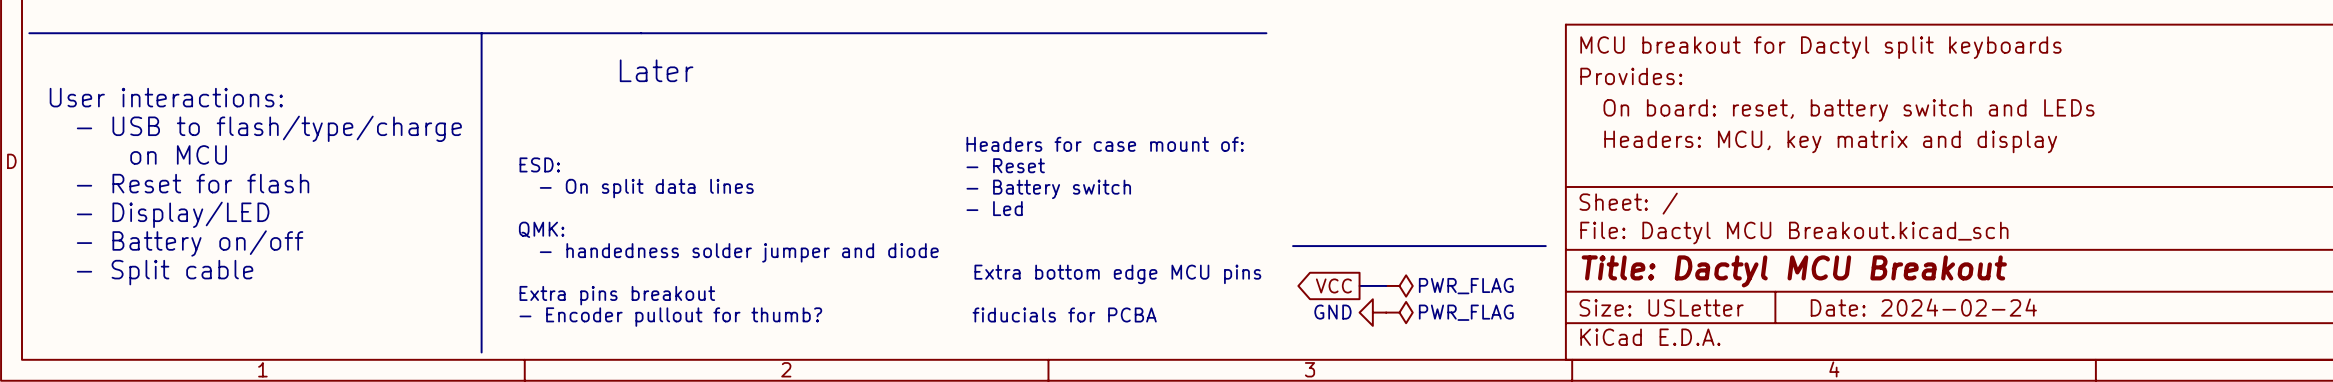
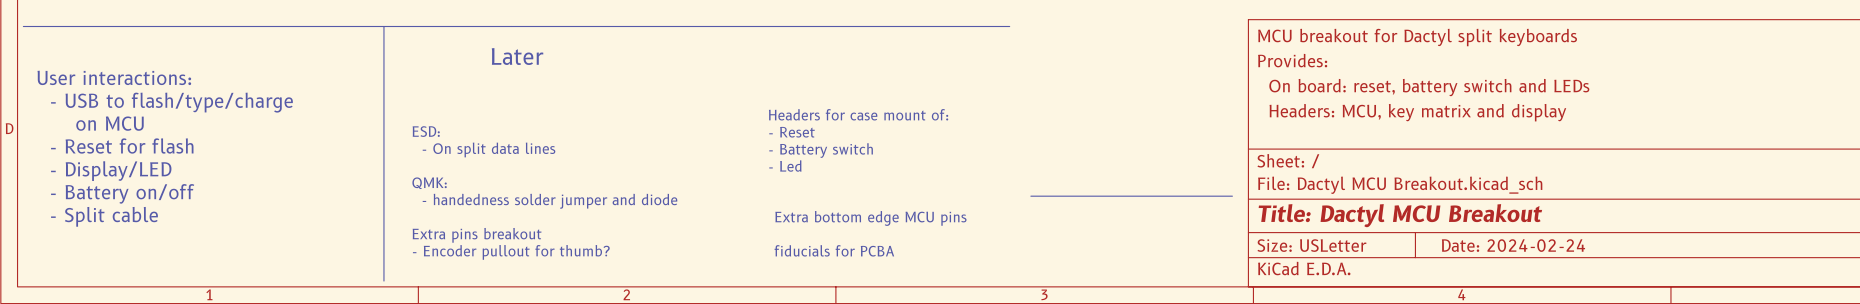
global label: VCC (1333, 285) -> none
wire: (1359, 285) (1386, 285) -> none
power symbol: PWR_FLAG (1399, 285) -> none
power symbol: GND (1372, 312) -> none
power symbol: PWR_FLAG (1399, 312) -> none

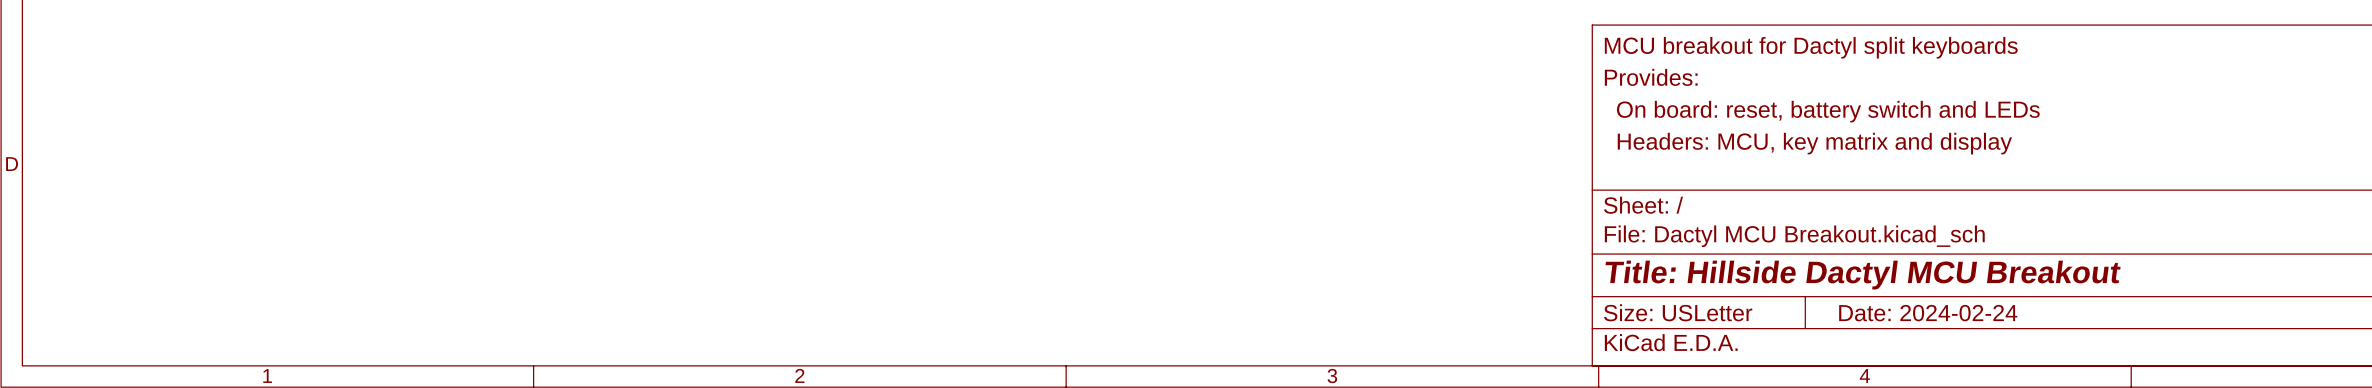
line: (23, 26) (1009, 26) -> none
line: (383, 26) (383, 281) -> none
text: Later (517, 56) -> none
text: User interactions: (114, 77) -> none
text: - USB to flash/type/charge (171, 102) -> none
text: Headers for case mount of: (858, 114) -> none
text: on MCU (109, 123) -> none
text: ESD: (426, 131) -> none
text: - Reset (792, 132) -> none
text: - Reset for flash (122, 146) -> none
text: - On split data lines (489, 149) -> none
text: - Battery switch (821, 150) -> none
text: - Led (785, 165) -> none
text: - Display/LED (111, 171) -> none
text: QMK: (429, 183) -> none
text: - Battery on/off (122, 193) -> none
line: (1030, 196) (1232, 196) -> none
text: - handedness solder jumper and diode (550, 201) -> none
title block: Title: Dactyl MCU Breakout (1400, 215) -> Title: Hillside Dactyl MCU Breakout (1863, 275)
text: - Split cable (104, 216) -> none
text: Extra bottom edge MCU pins (870, 218) -> none
text: Extra pins breakout (477, 235) -> none
text: fiducials for PCBA (834, 250) -> none
text: - Encoder pullout for thumb? (511, 252) -> none

